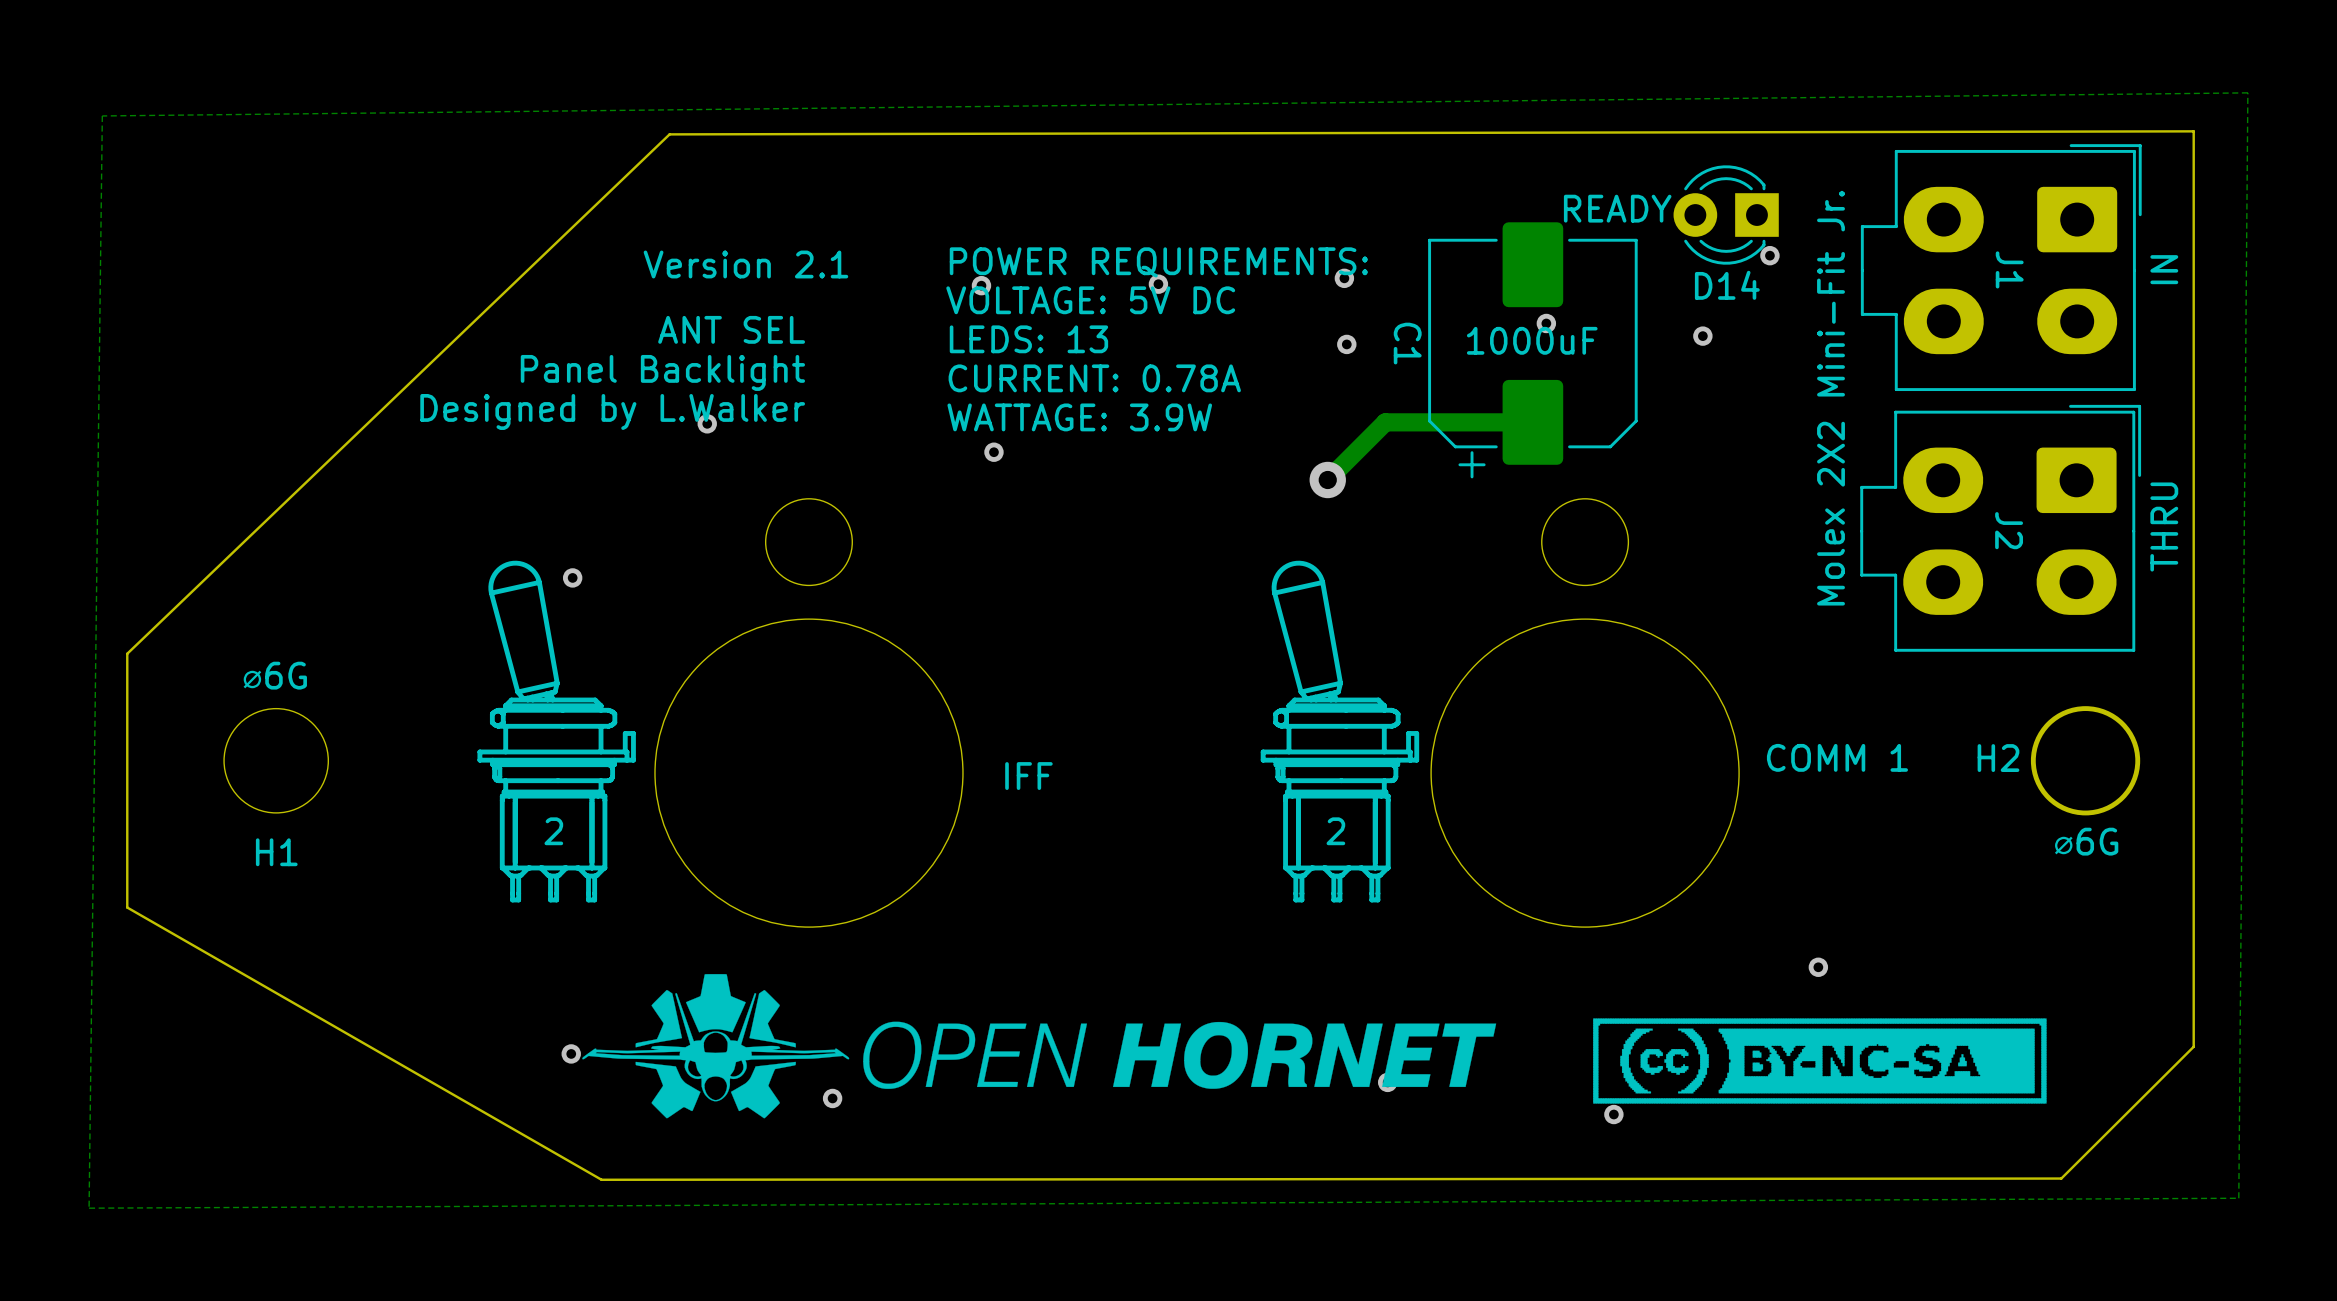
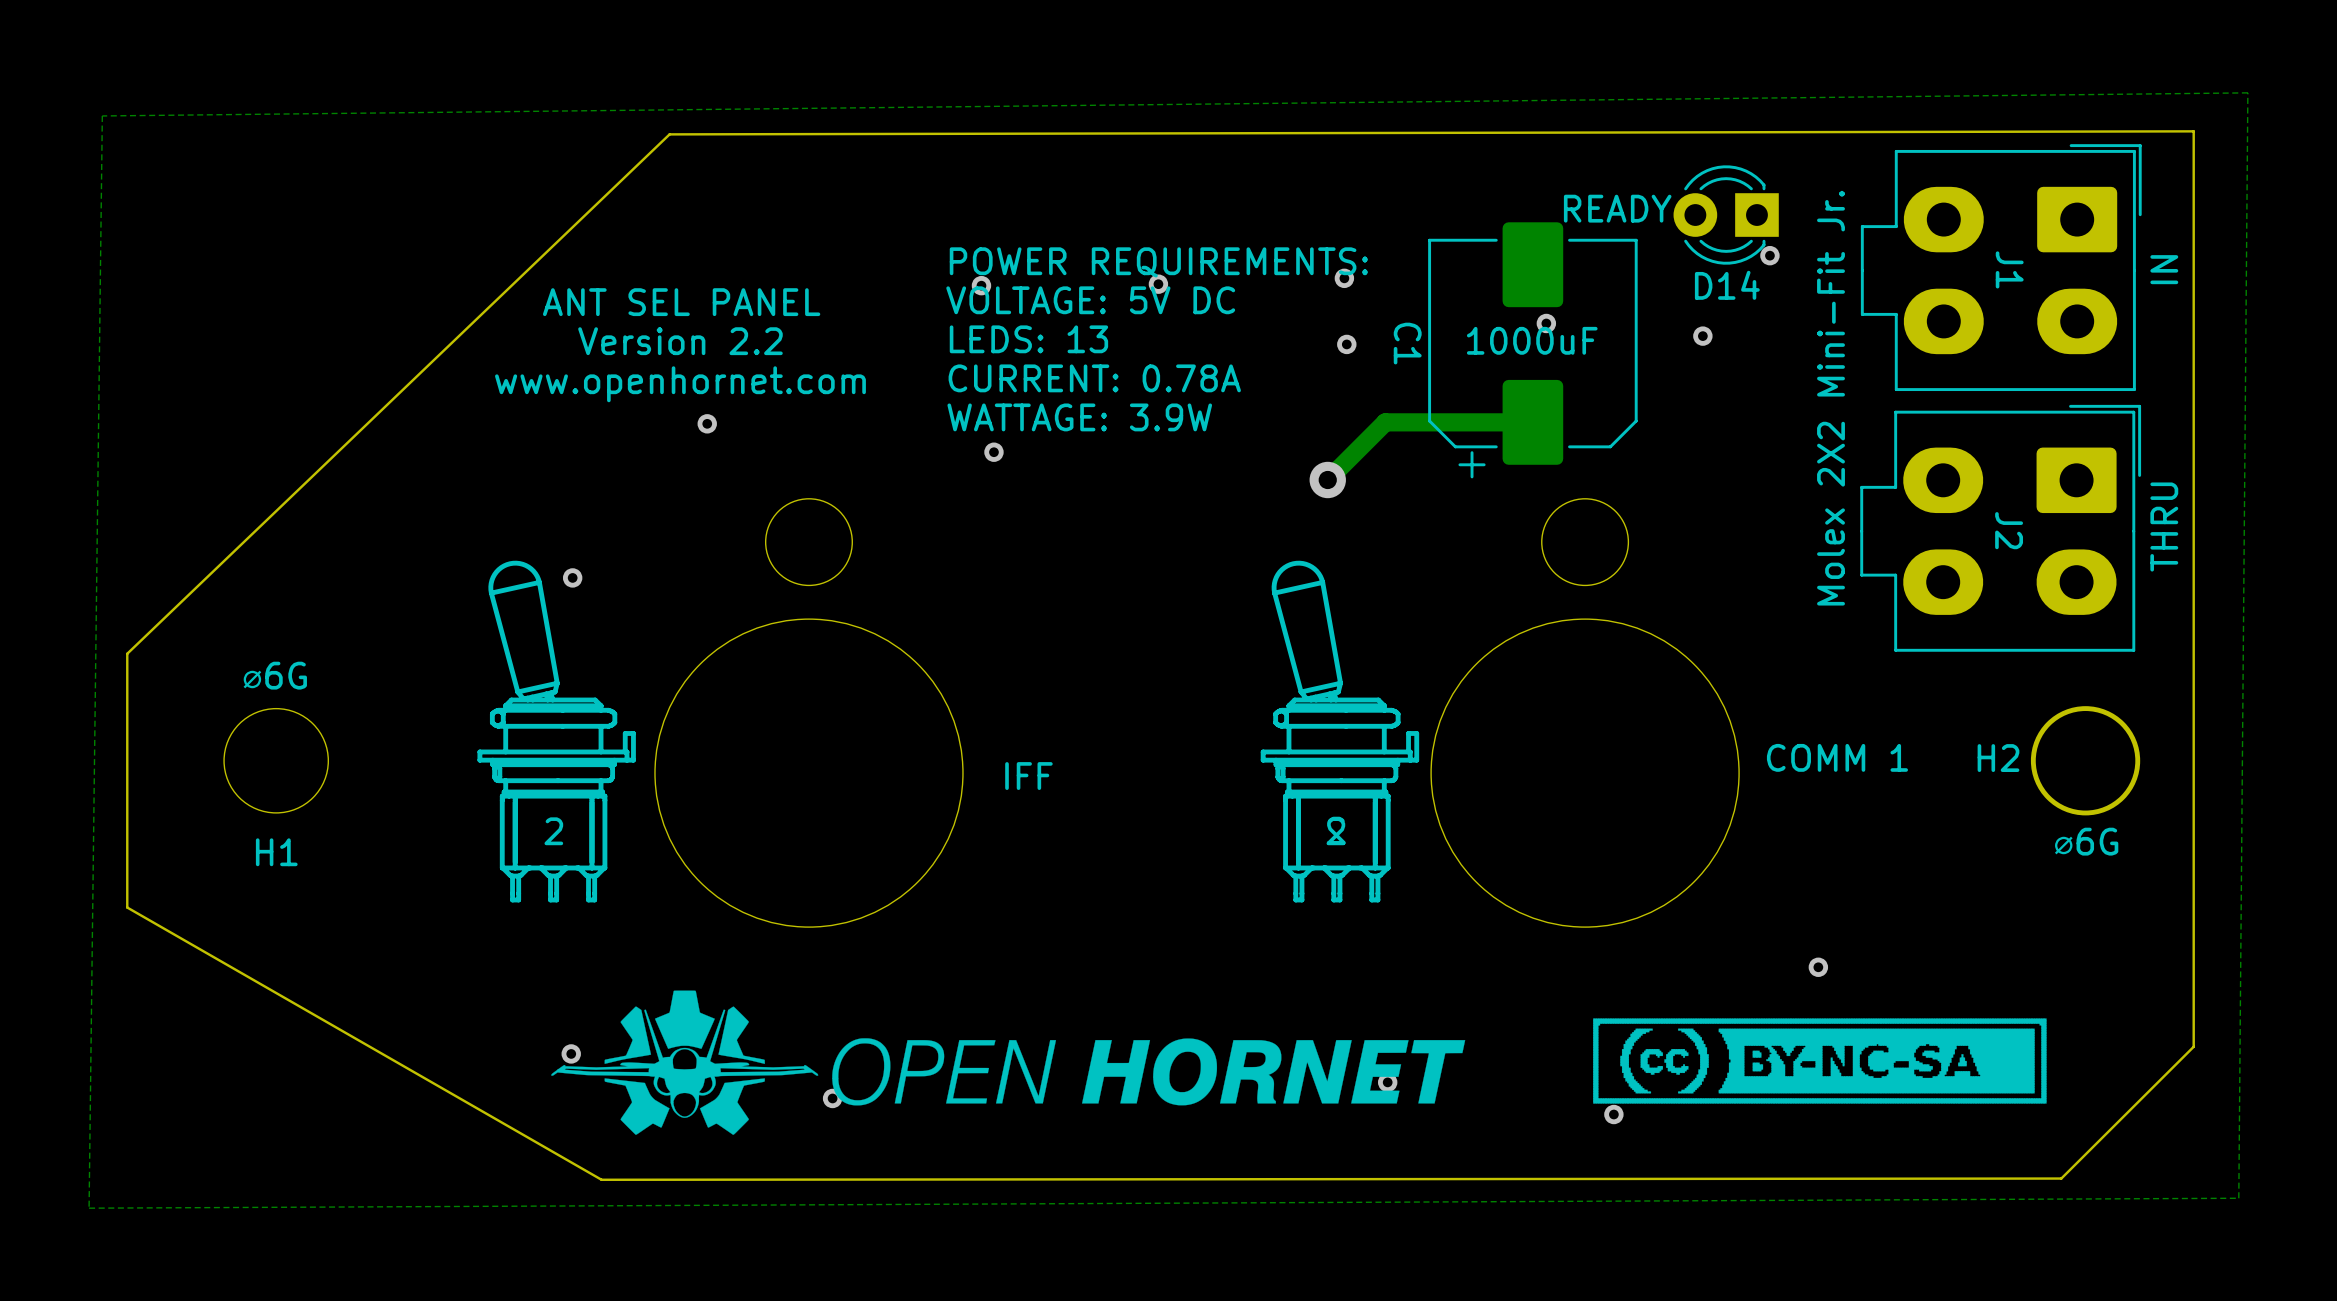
text: Version 2.1 (745, 264) -> none
text: ANT SEL (731, 329) -> ANT SEL PANEL (681, 302)
text: none -> Version 2.2 (680, 341)
text: Panel Backlight (662, 372) -> none
text: none -> www.openhornet.com (680, 384)
text: Designed by L.Walker (612, 411) -> none
drawing shape: [1260, 560, 1420, 903] -> [1260, 560, 1420, 903]
drawing position: (1039, 1046) -> (1008, 1062)

